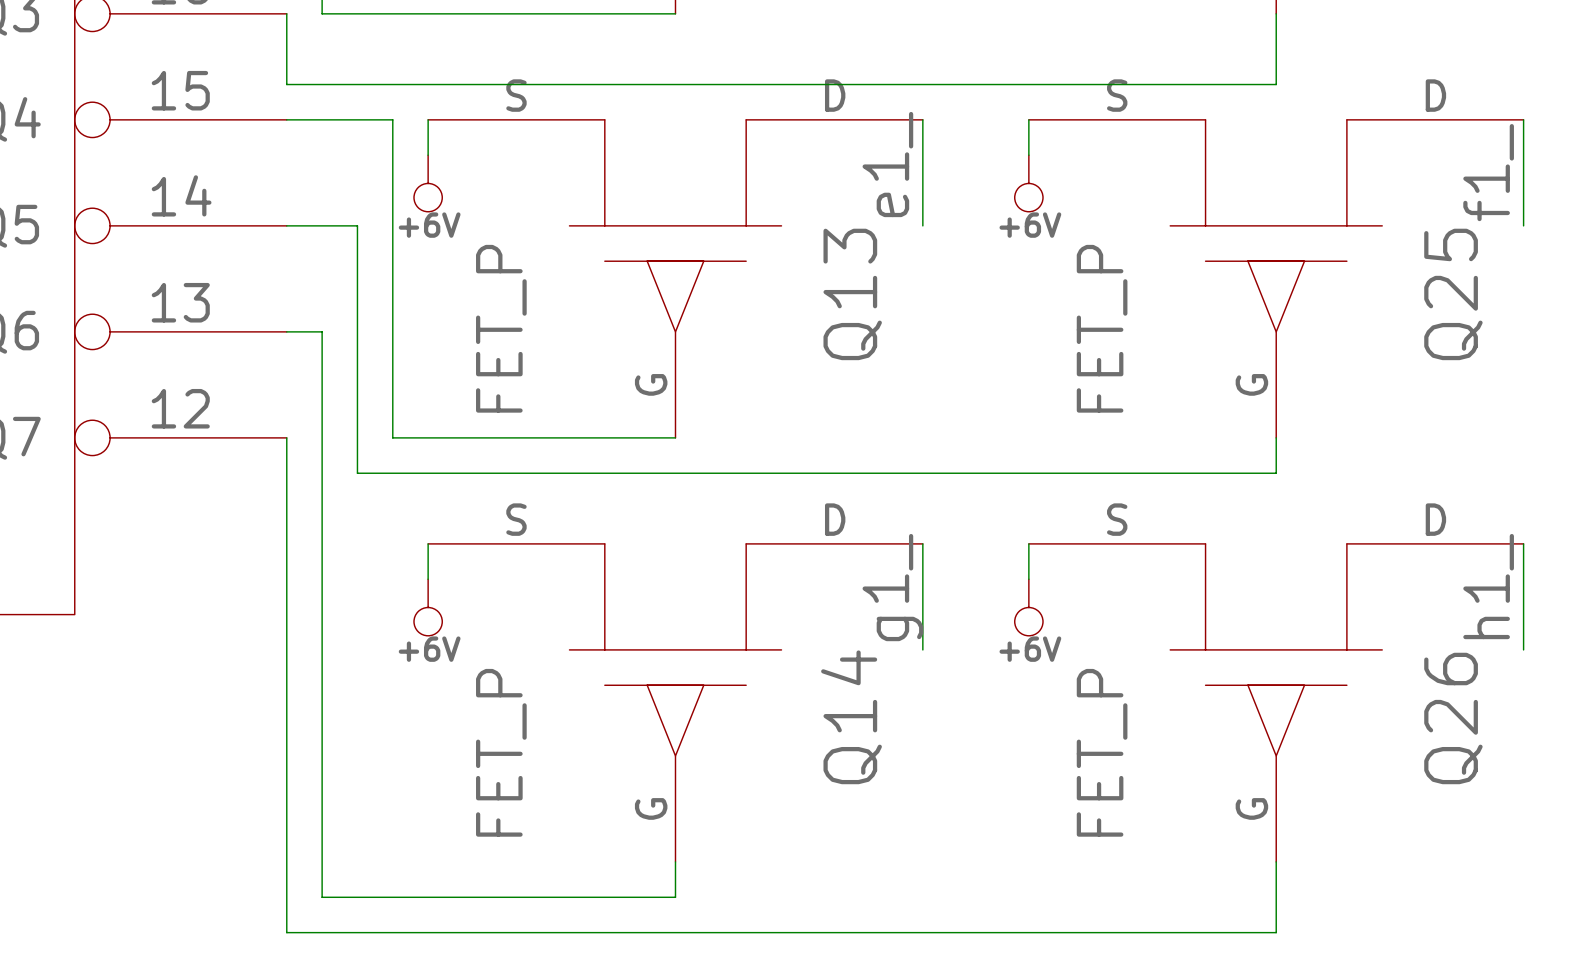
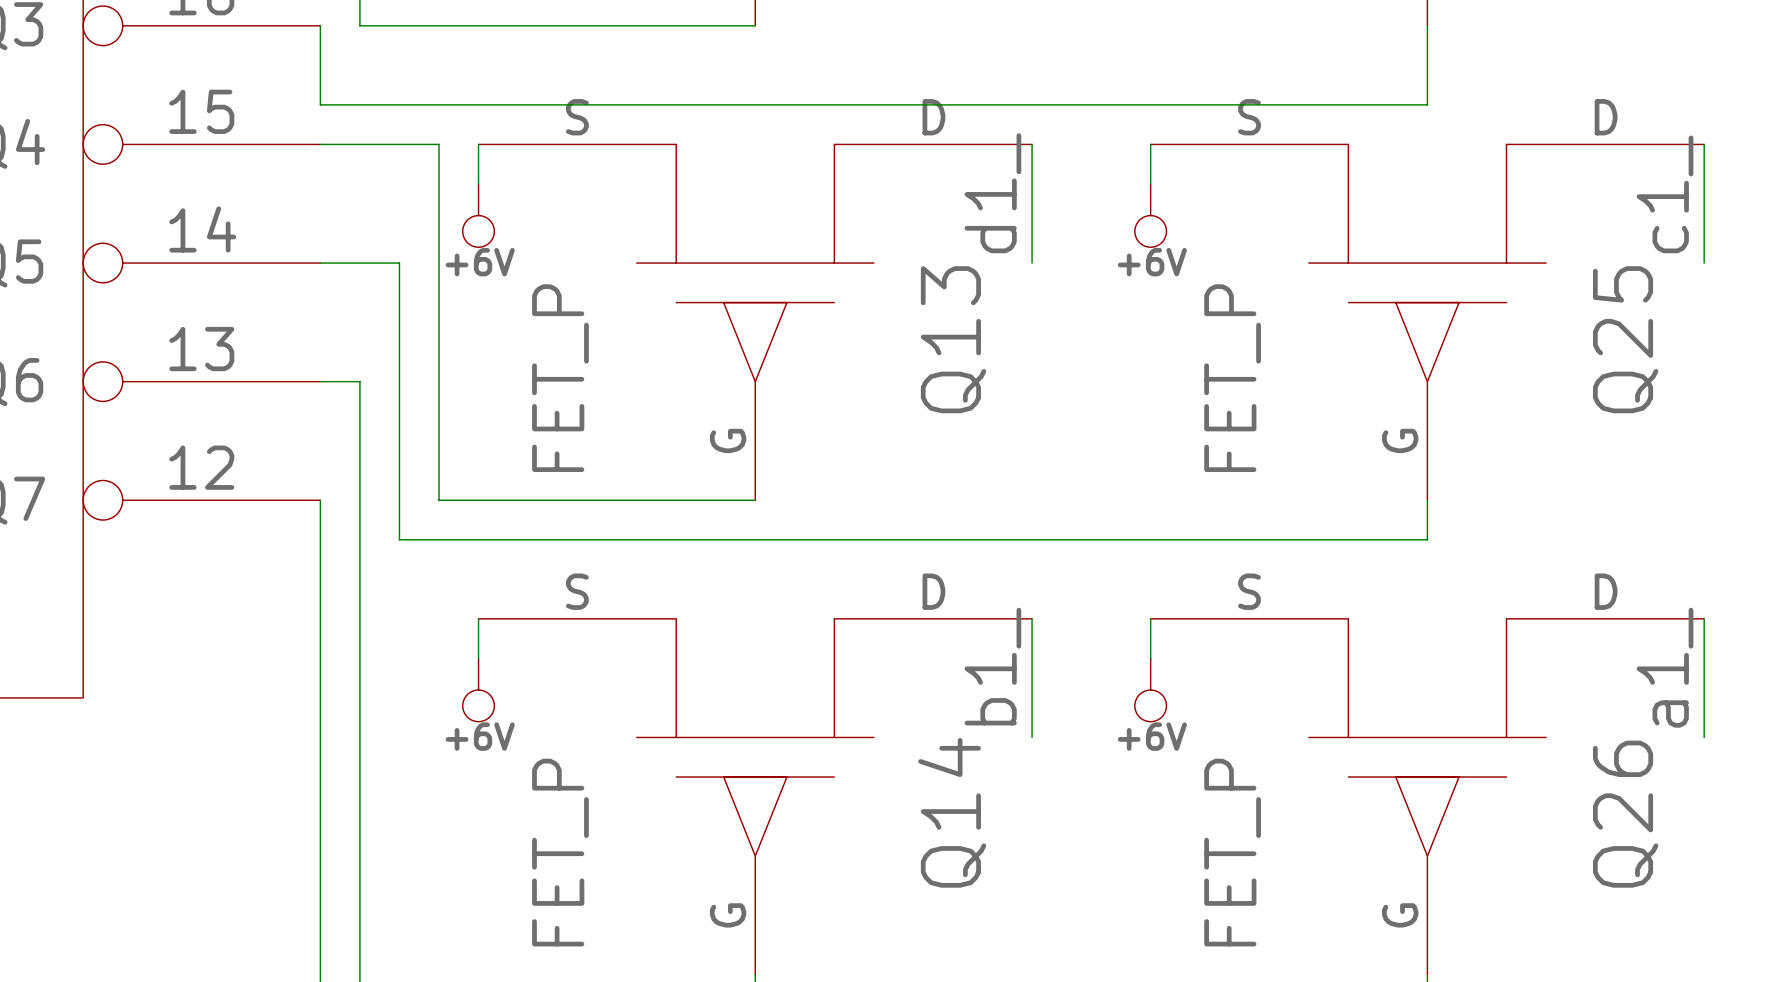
label: e1_ (887, 164) -> d1_ (992, 193)
label: f1_ (1488, 172) -> c1_ (1665, 194)
label: h1_ (1488, 586) -> a1_ (1665, 667)
label: g1_ (892, 587) -> b1_ (992, 666)

